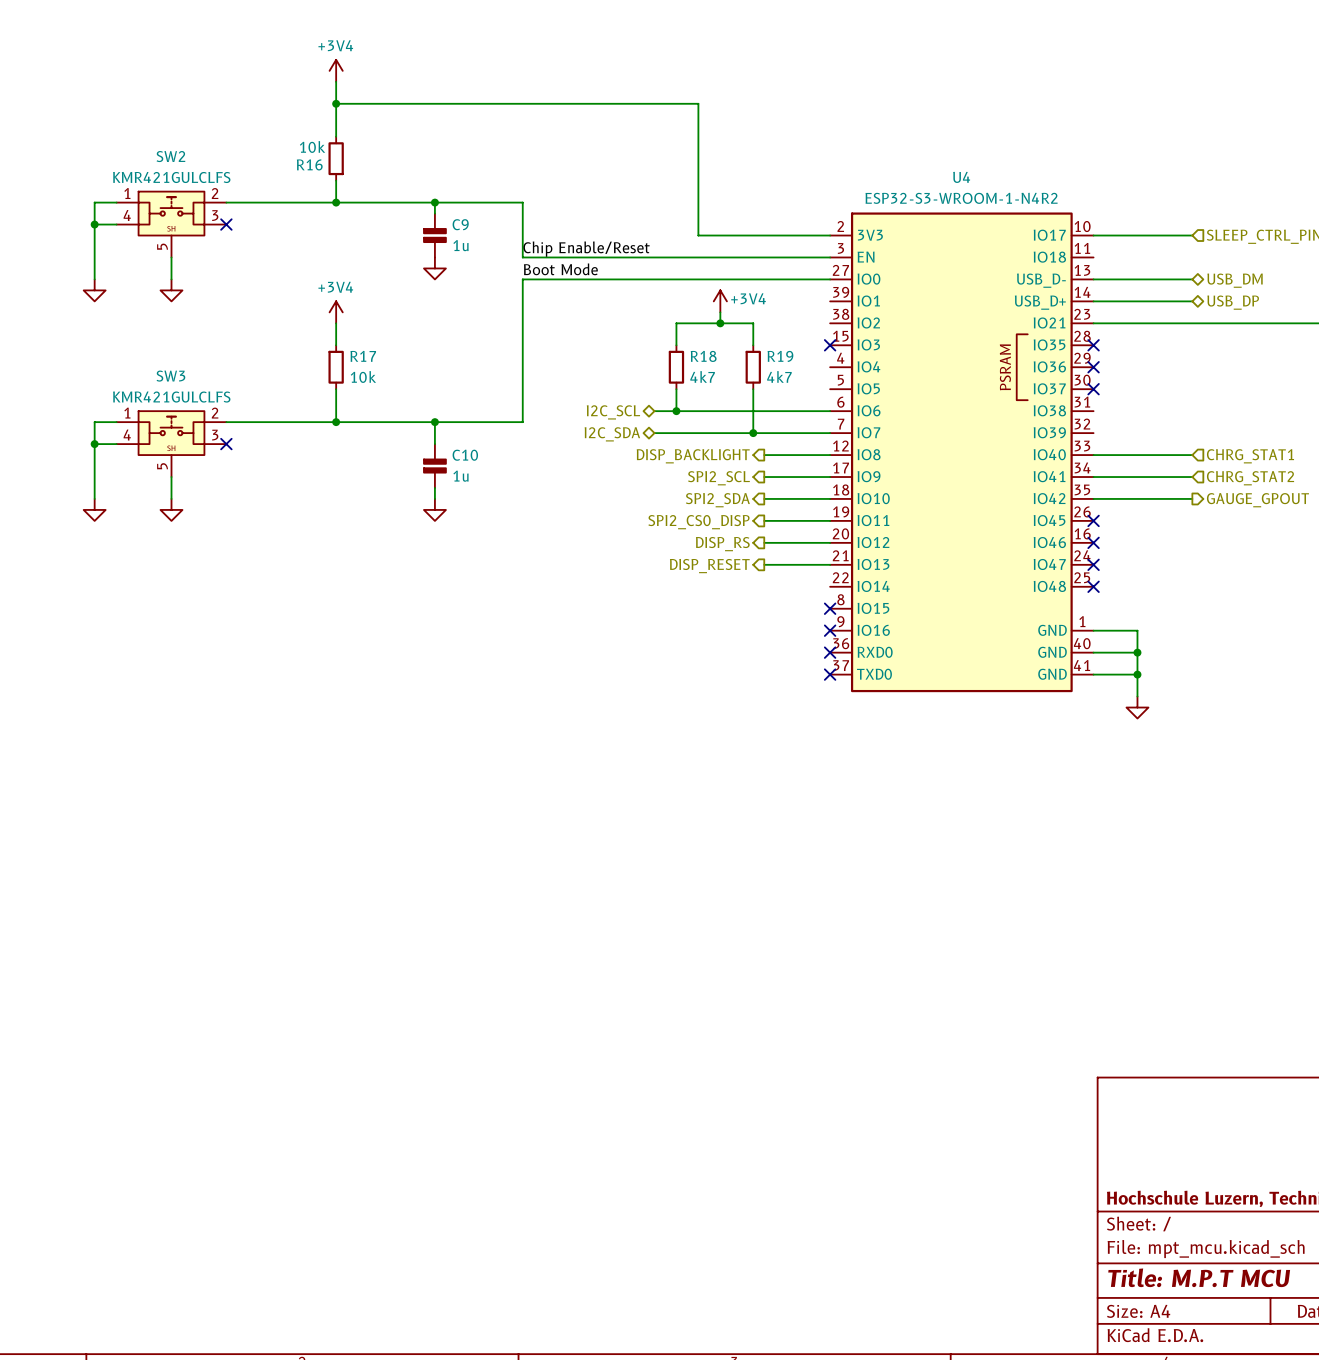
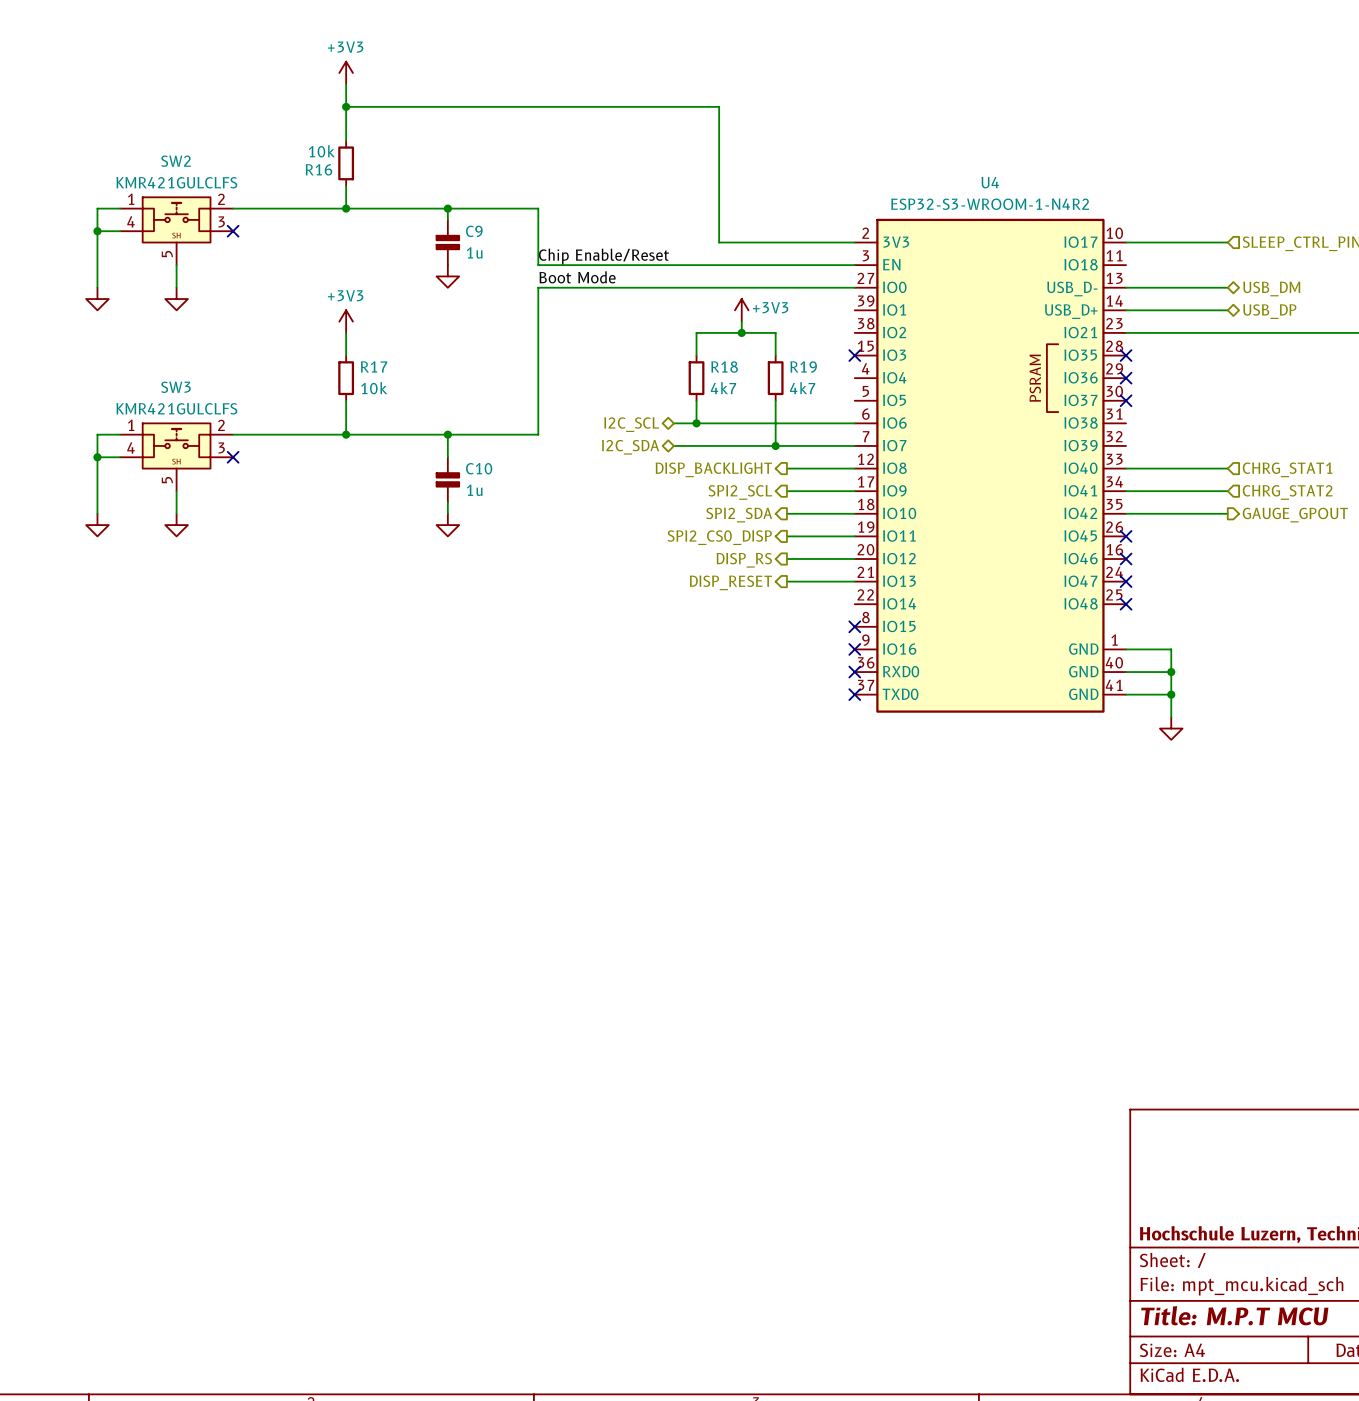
power symbol: +3V4 (336, 70) -> +3V3 (346, 72)
power symbol: +3V4 (720, 301) -> +3V3 (741, 310)
power symbol: +3V4 (336, 312) -> +3V3 (346, 321)

